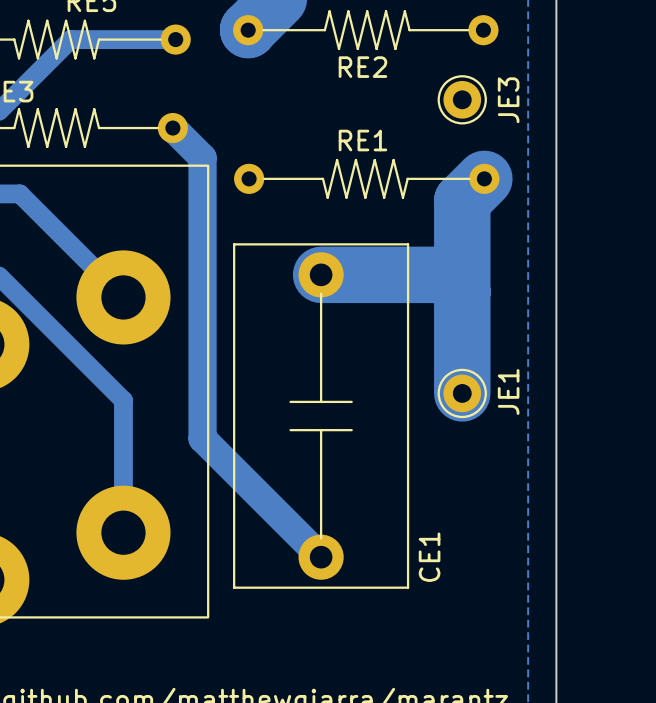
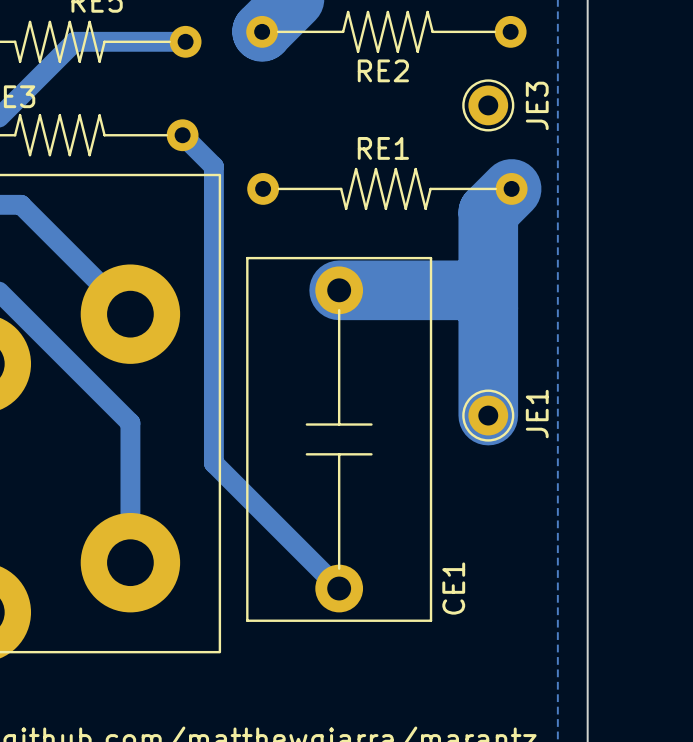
bottom track width: thick (172, 128) (202, 157) (202, 438) (321, 557) -> thin (182, 135) (213, 166) (213, 463) (339, 588)

